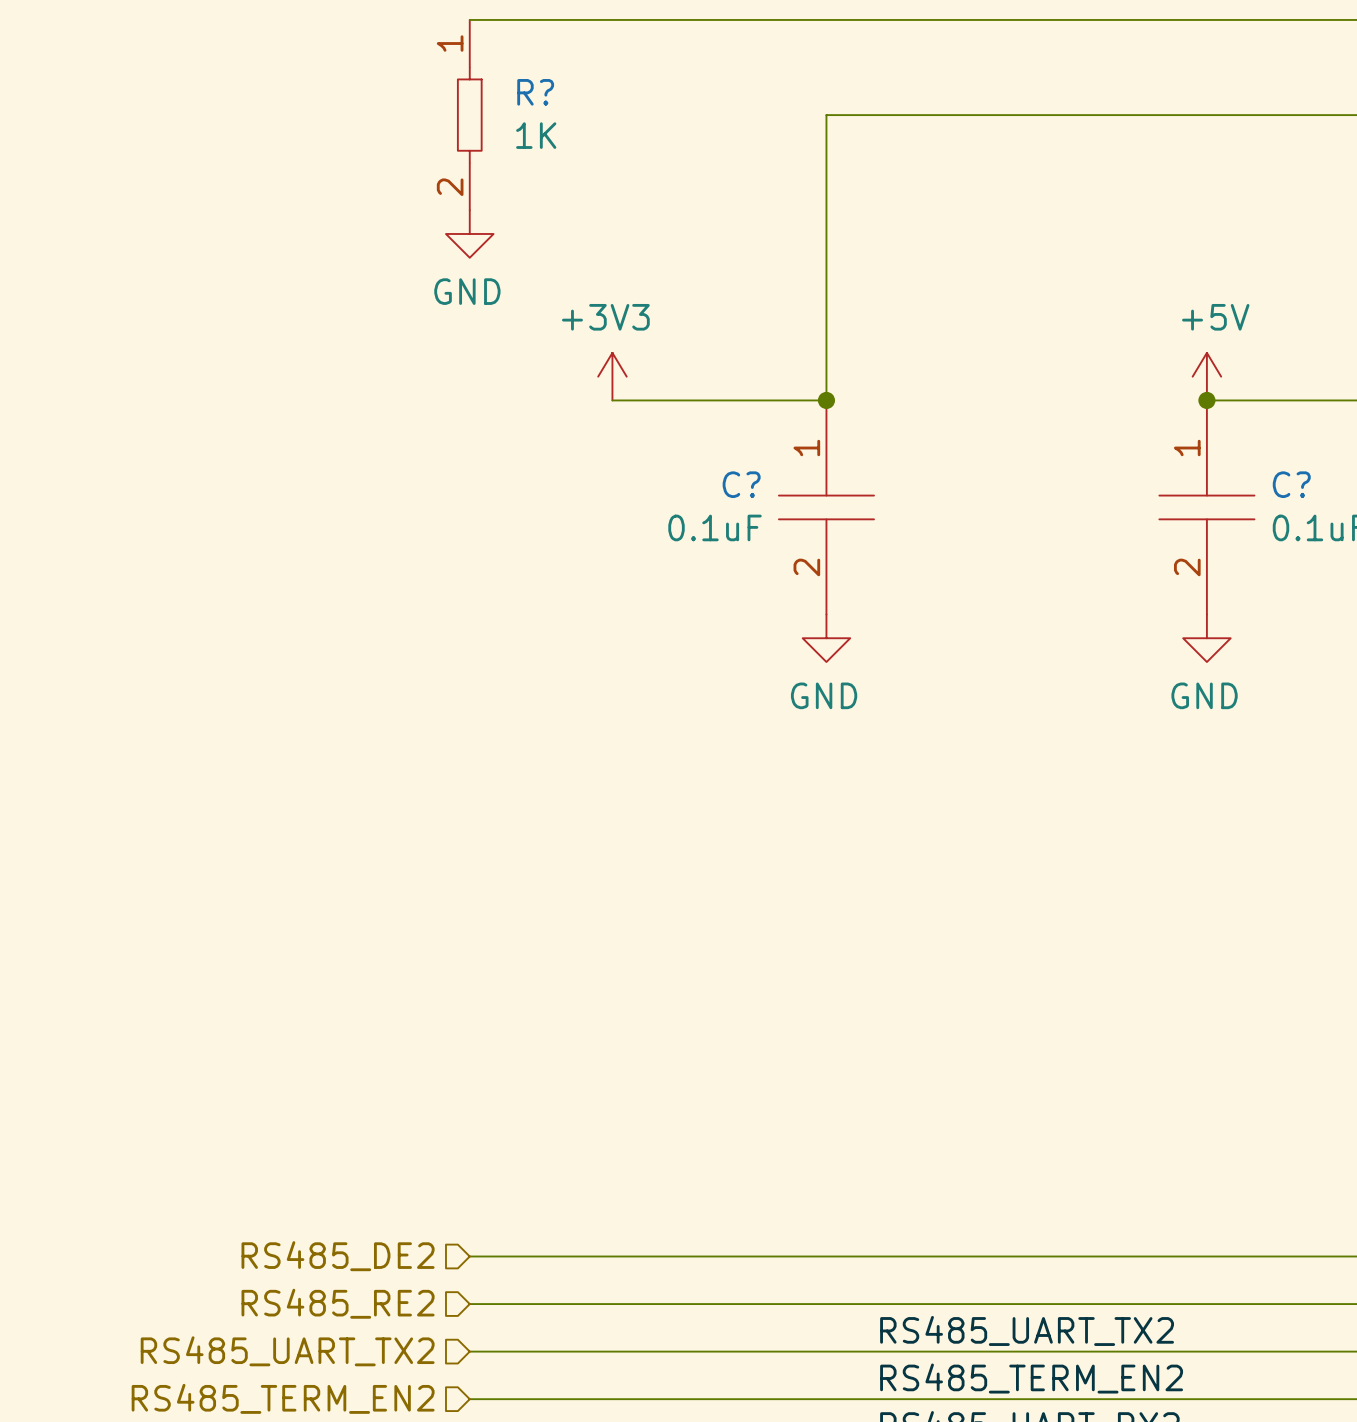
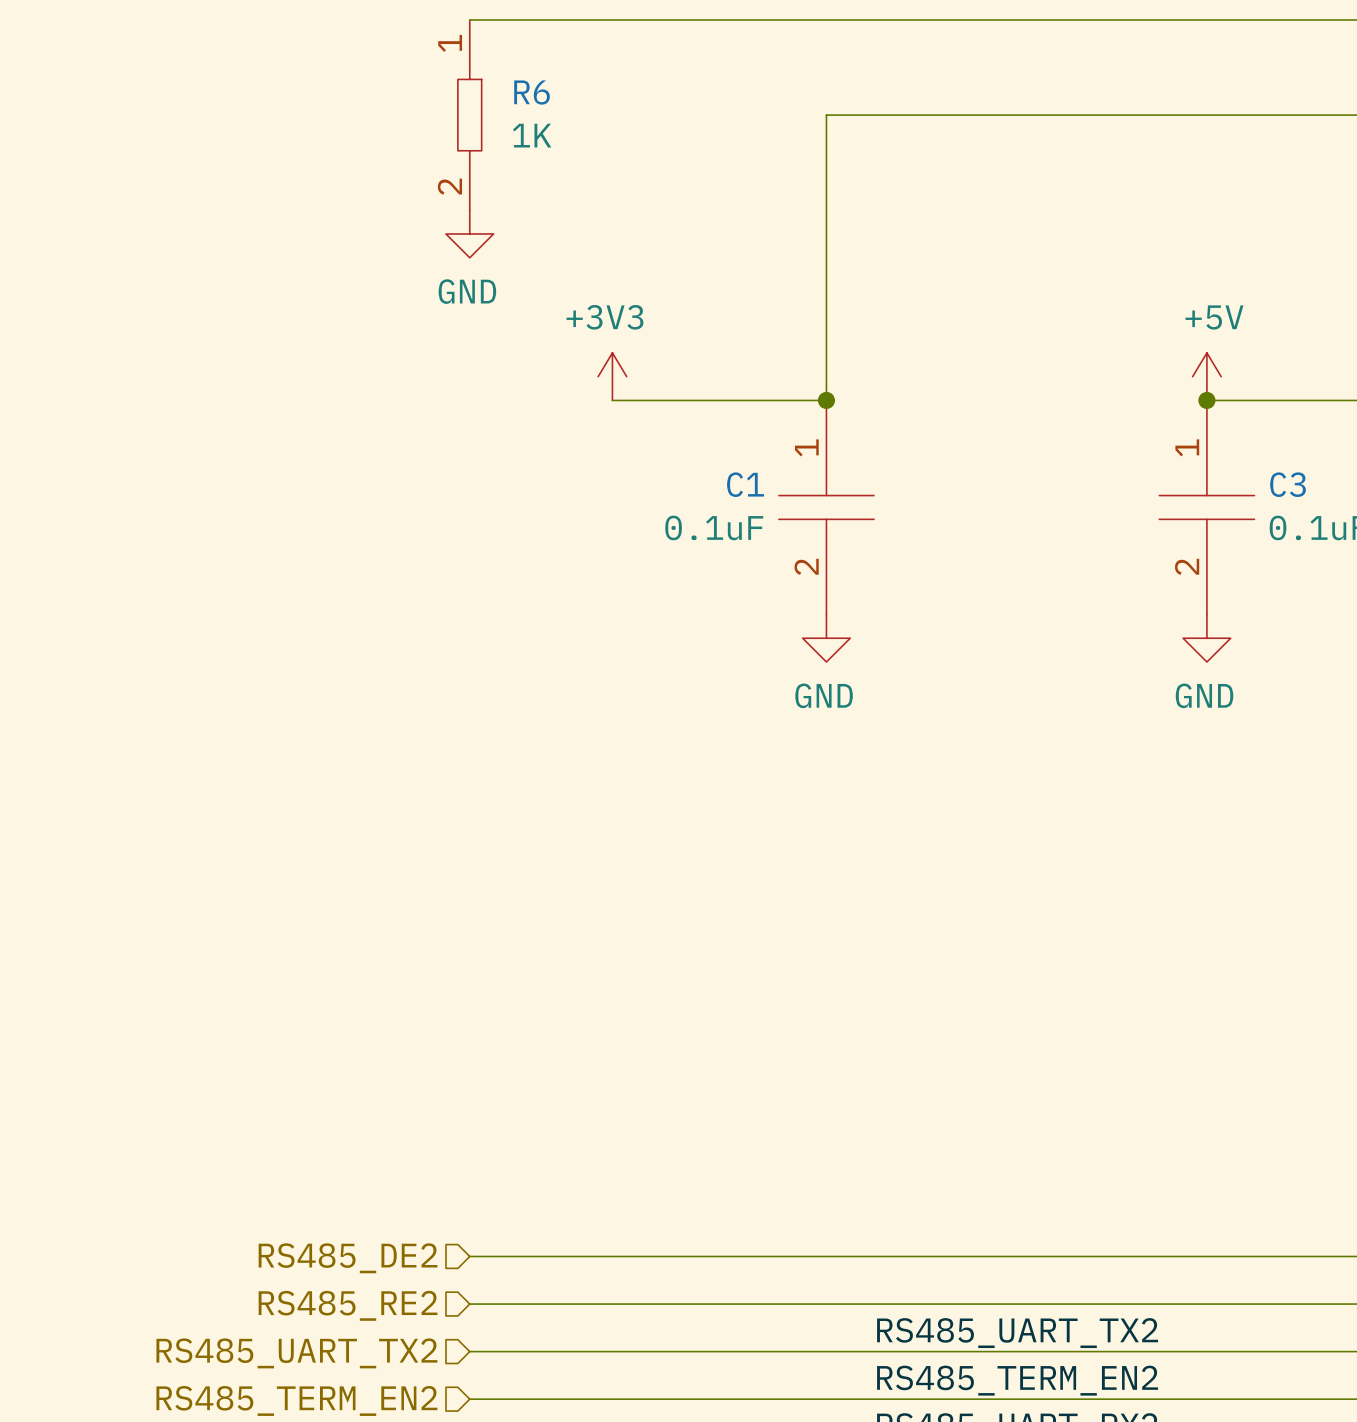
R? name: R? (535, 92) -> R6 (532, 92)
C? name: C? (741, 484) -> C1 (745, 484)
C? name: C? (1291, 484) -> C3 (1288, 484)

